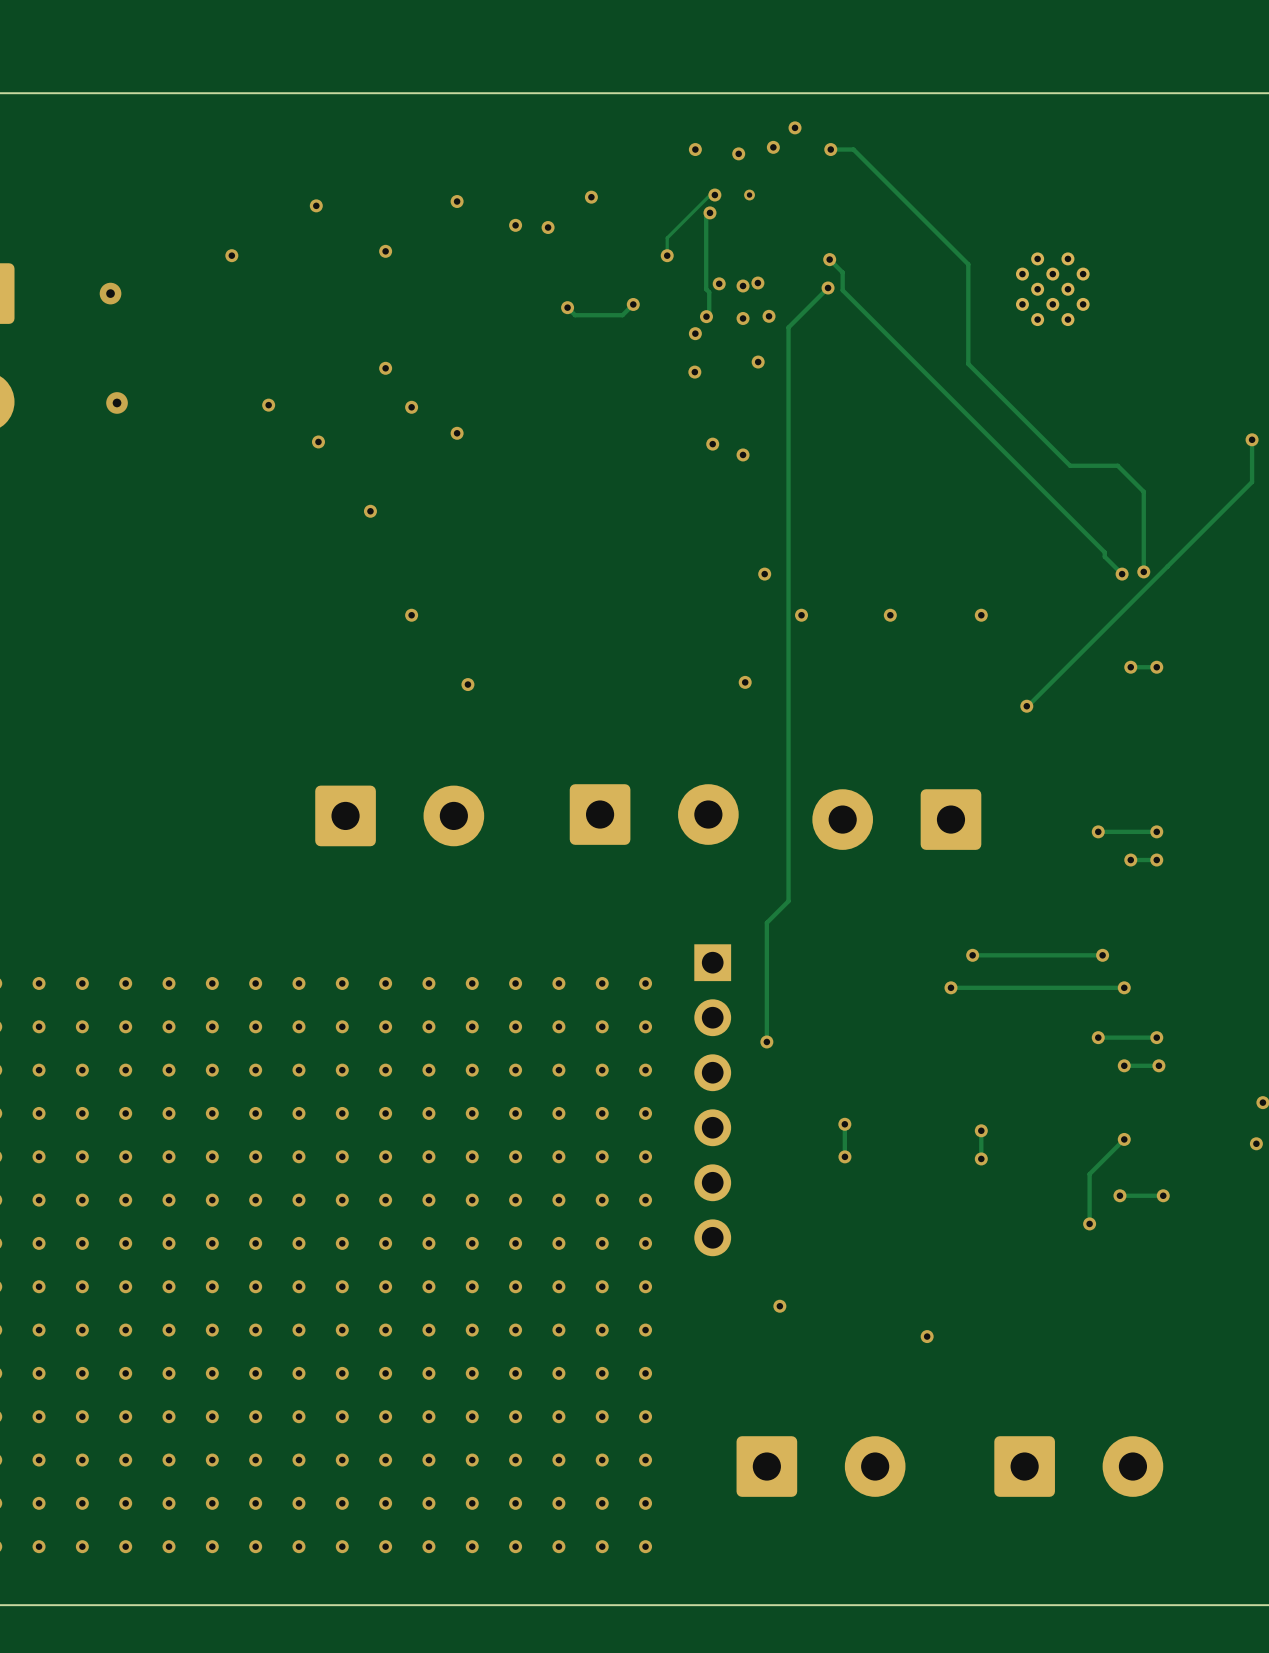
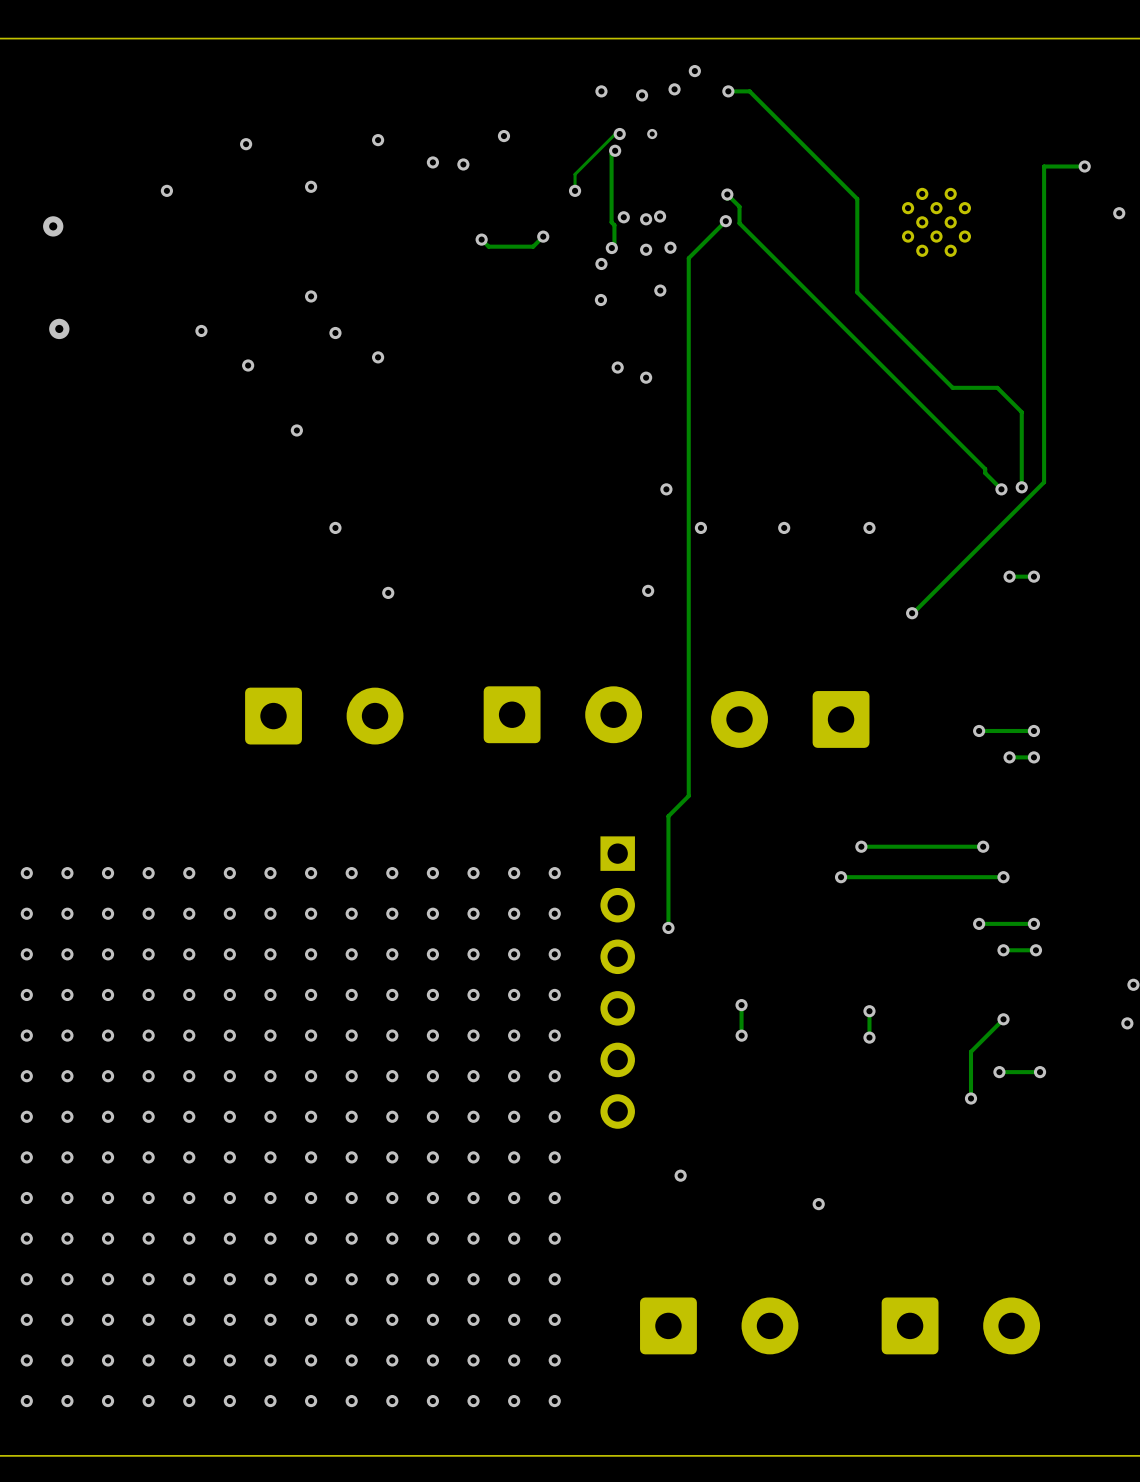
via: none -> (1084, 166)
via: none -> (1119, 213)
track: (1252, 439) (1252, 482) (1167, 566) -> (1084, 166) (1044, 166) (1044, 482)
via: (1252, 439) -> none

